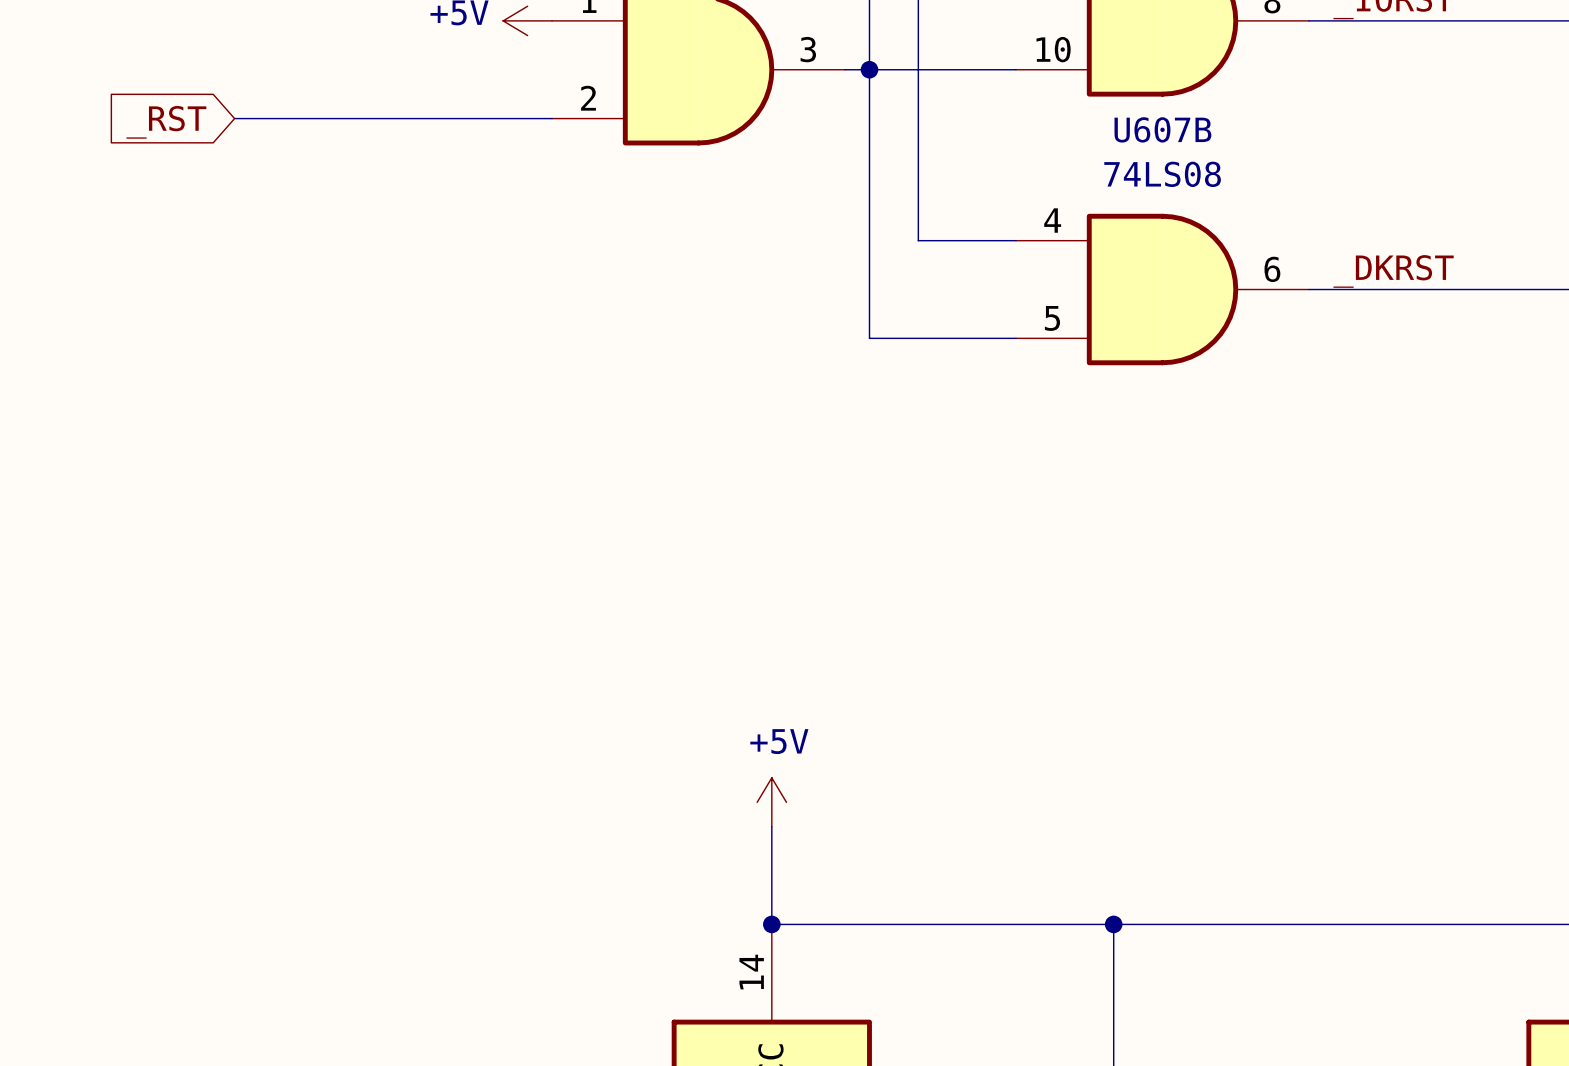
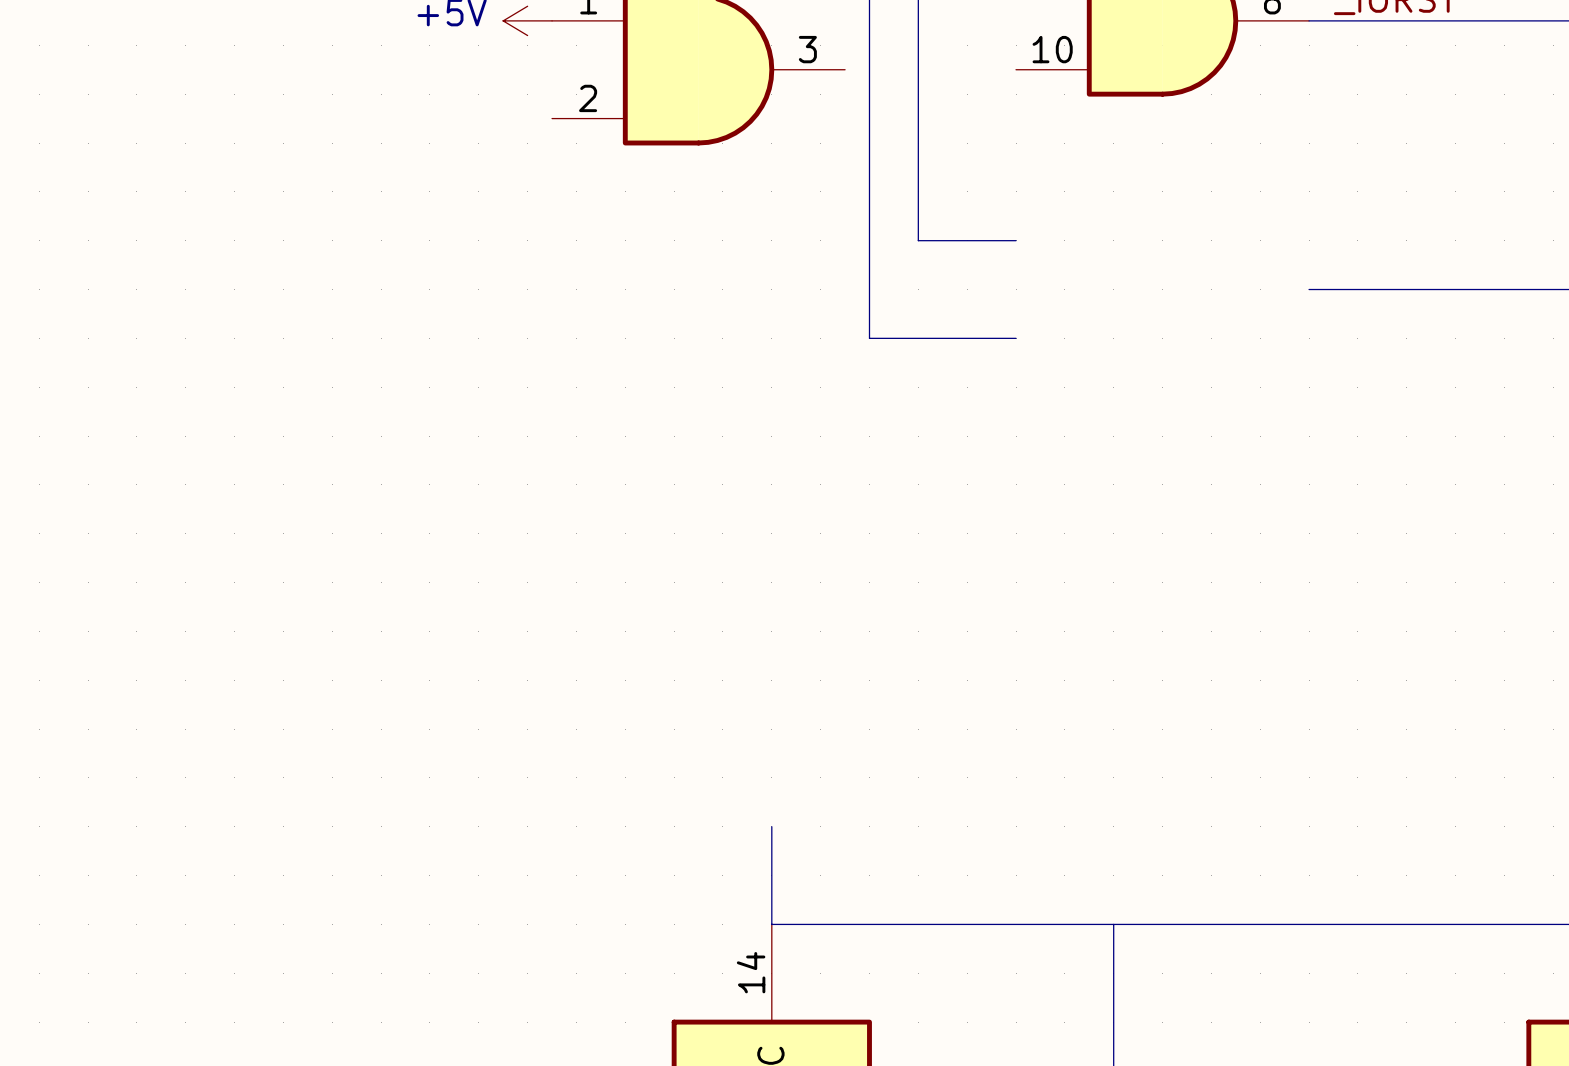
wire: (845, 69) (1016, 69) -> none
junction: (869, 69) -> none
wire: (234, 118) (552, 118) -> none
global label: _RST (166, 122) -> none
label: _DKRST (1393, 271) -> none
U607B: 74LS08 (1162, 289) -> none
power symbol: +5V (771, 802) -> none
junction: (771, 924) -> none
junction: (1113, 924) -> none

